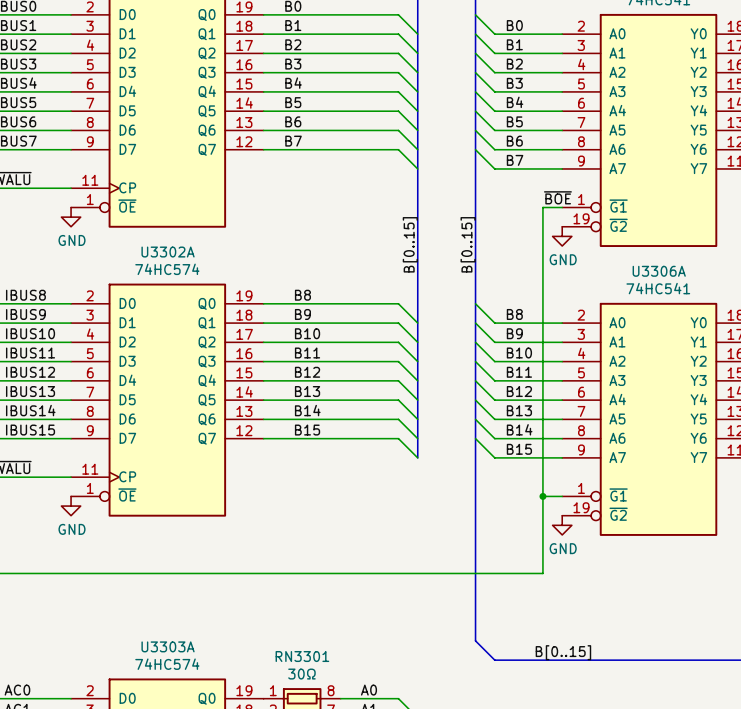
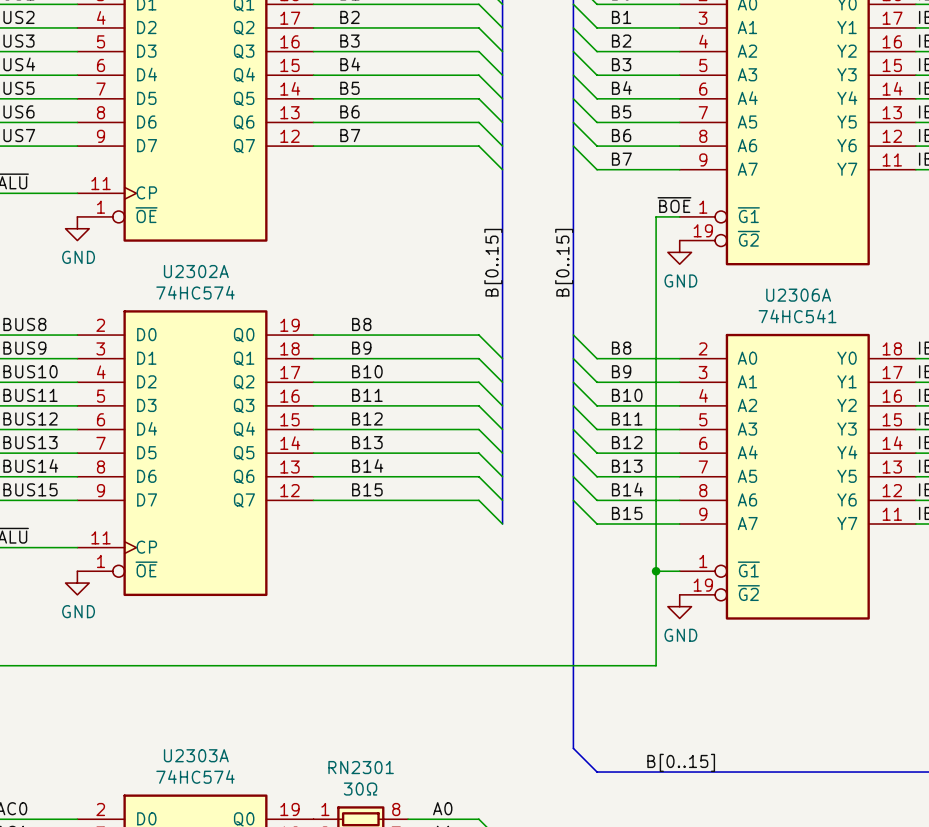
U3302A name: U3302A (168, 252) -> U2302A (196, 271)
U3306A name: U3306A (659, 271) -> U2306A (798, 295)
U3303A name: U3303A (168, 646) -> U2303A (196, 755)
RN3301 name: RN3301 (302, 656) -> RN2301 (361, 767)

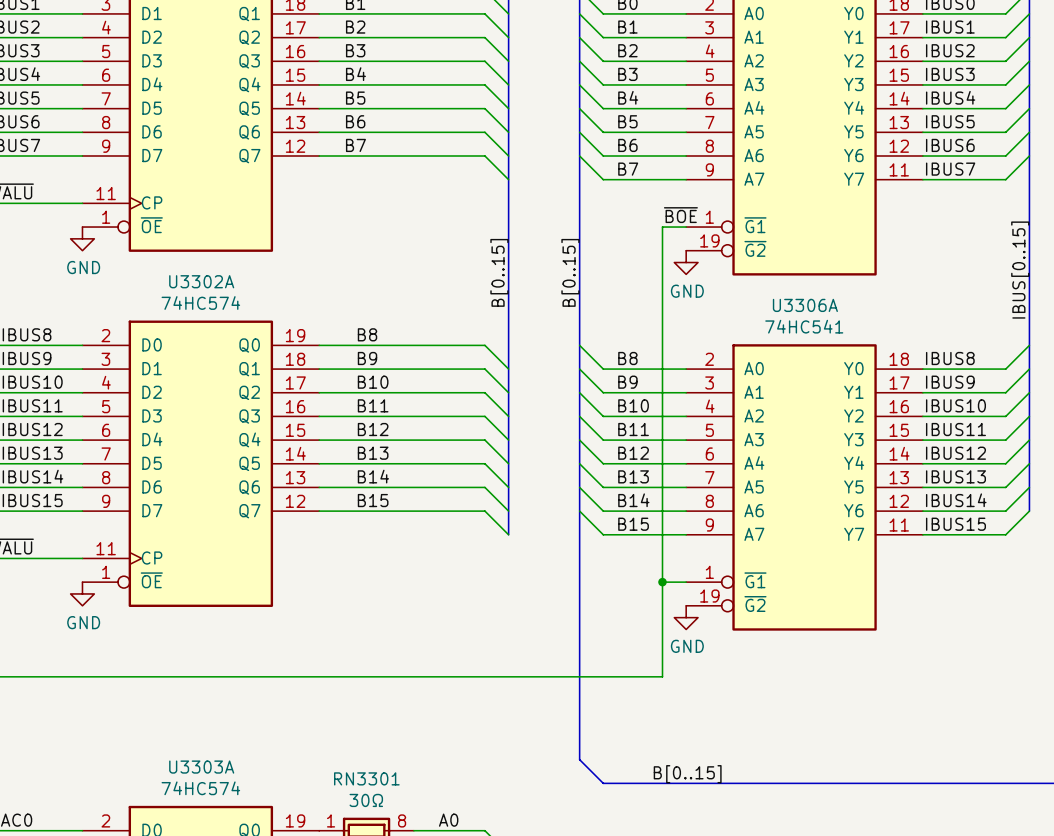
U2302A name: U2302A (196, 271) -> U3302A (201, 281)
U2306A name: U2306A (798, 295) -> U3306A (805, 305)
U2303A name: U2303A (196, 755) -> U3303A (201, 767)
RN2301 name: RN2301 (361, 767) -> RN3301 (366, 778)

